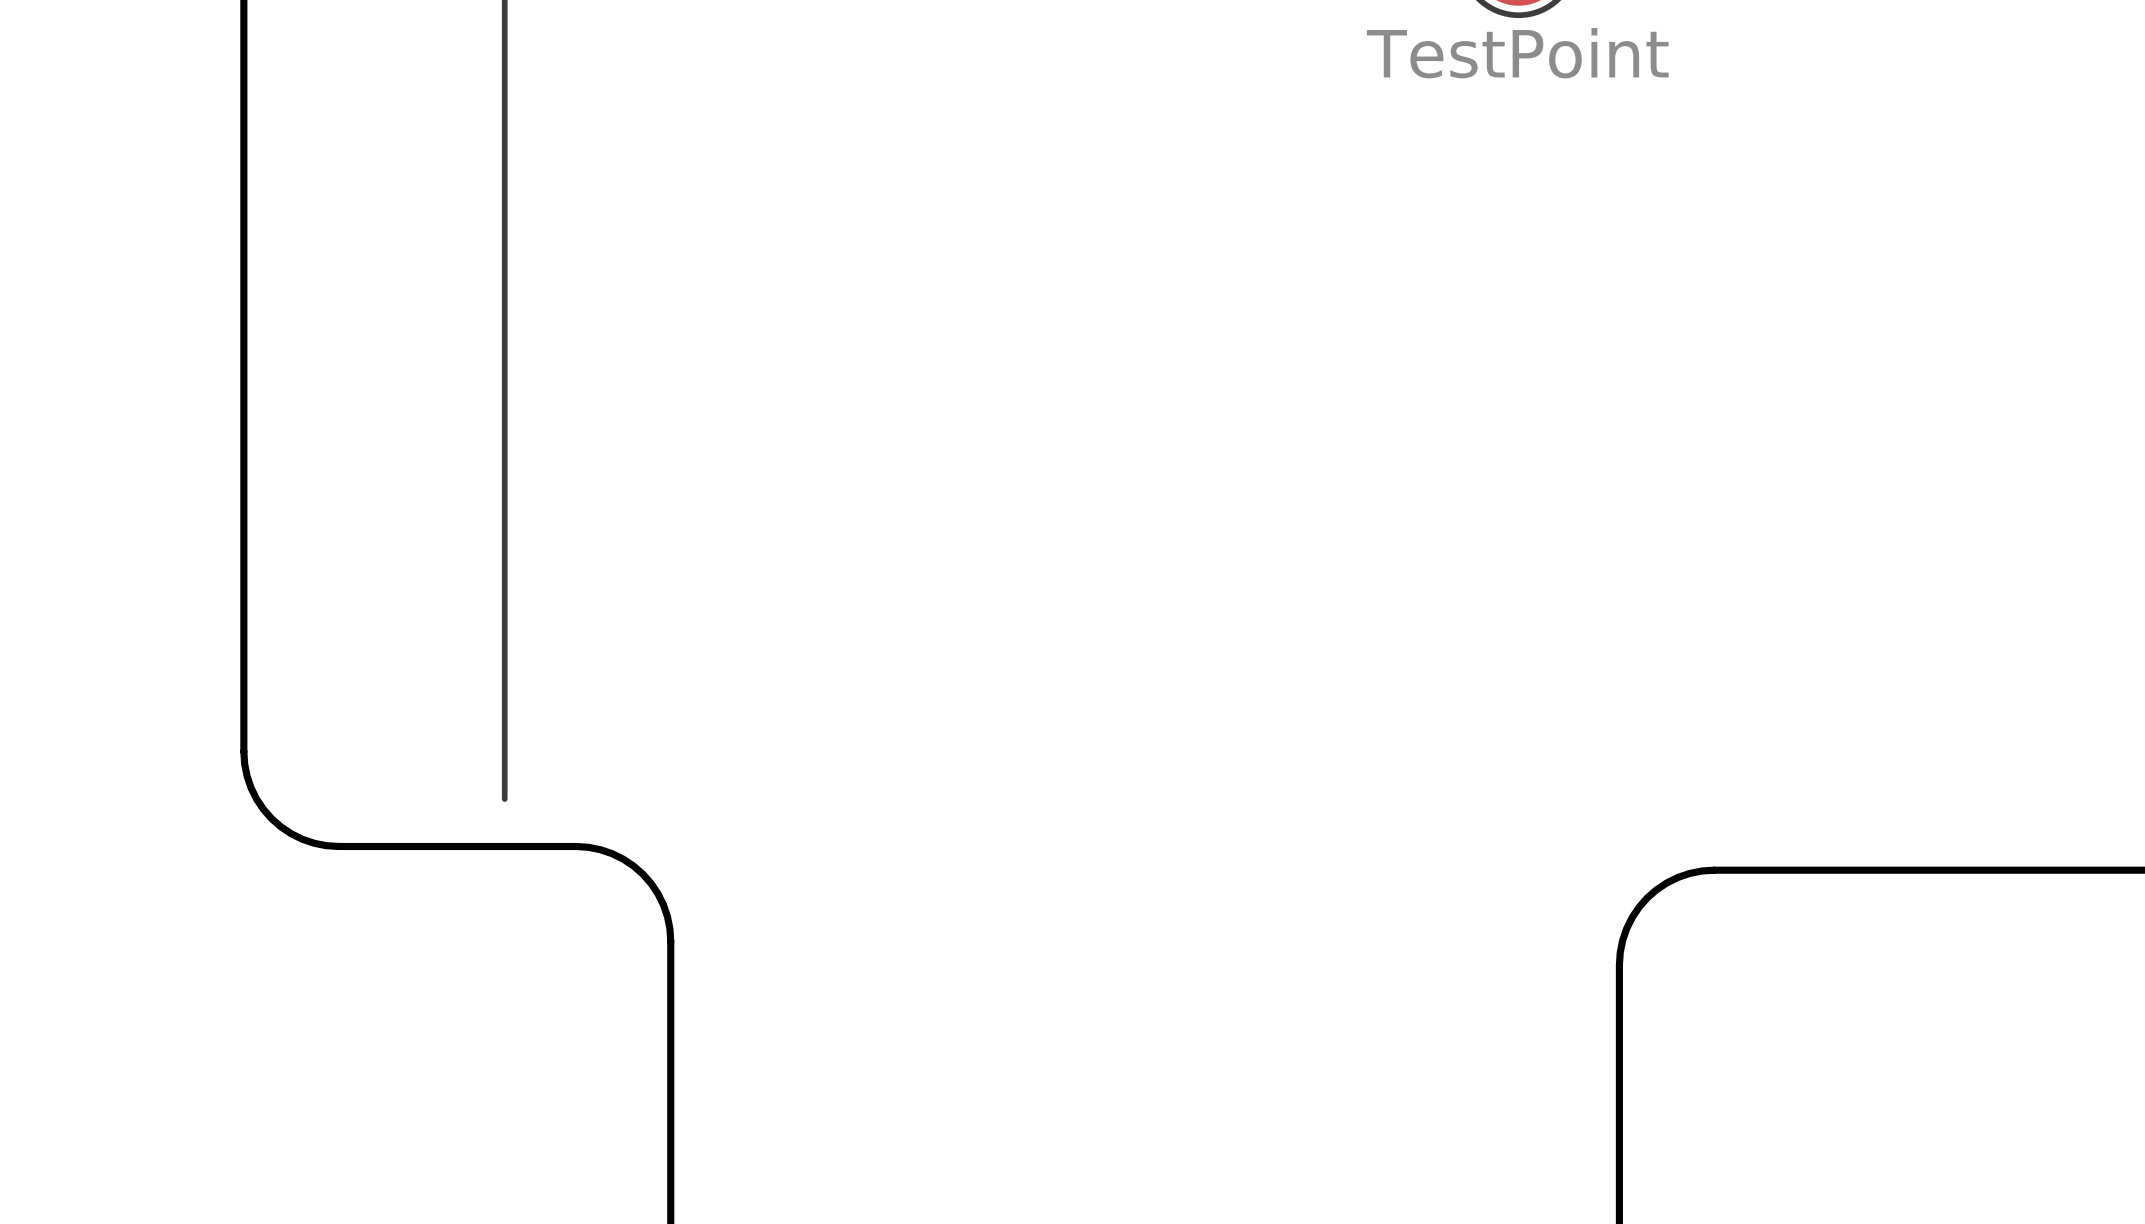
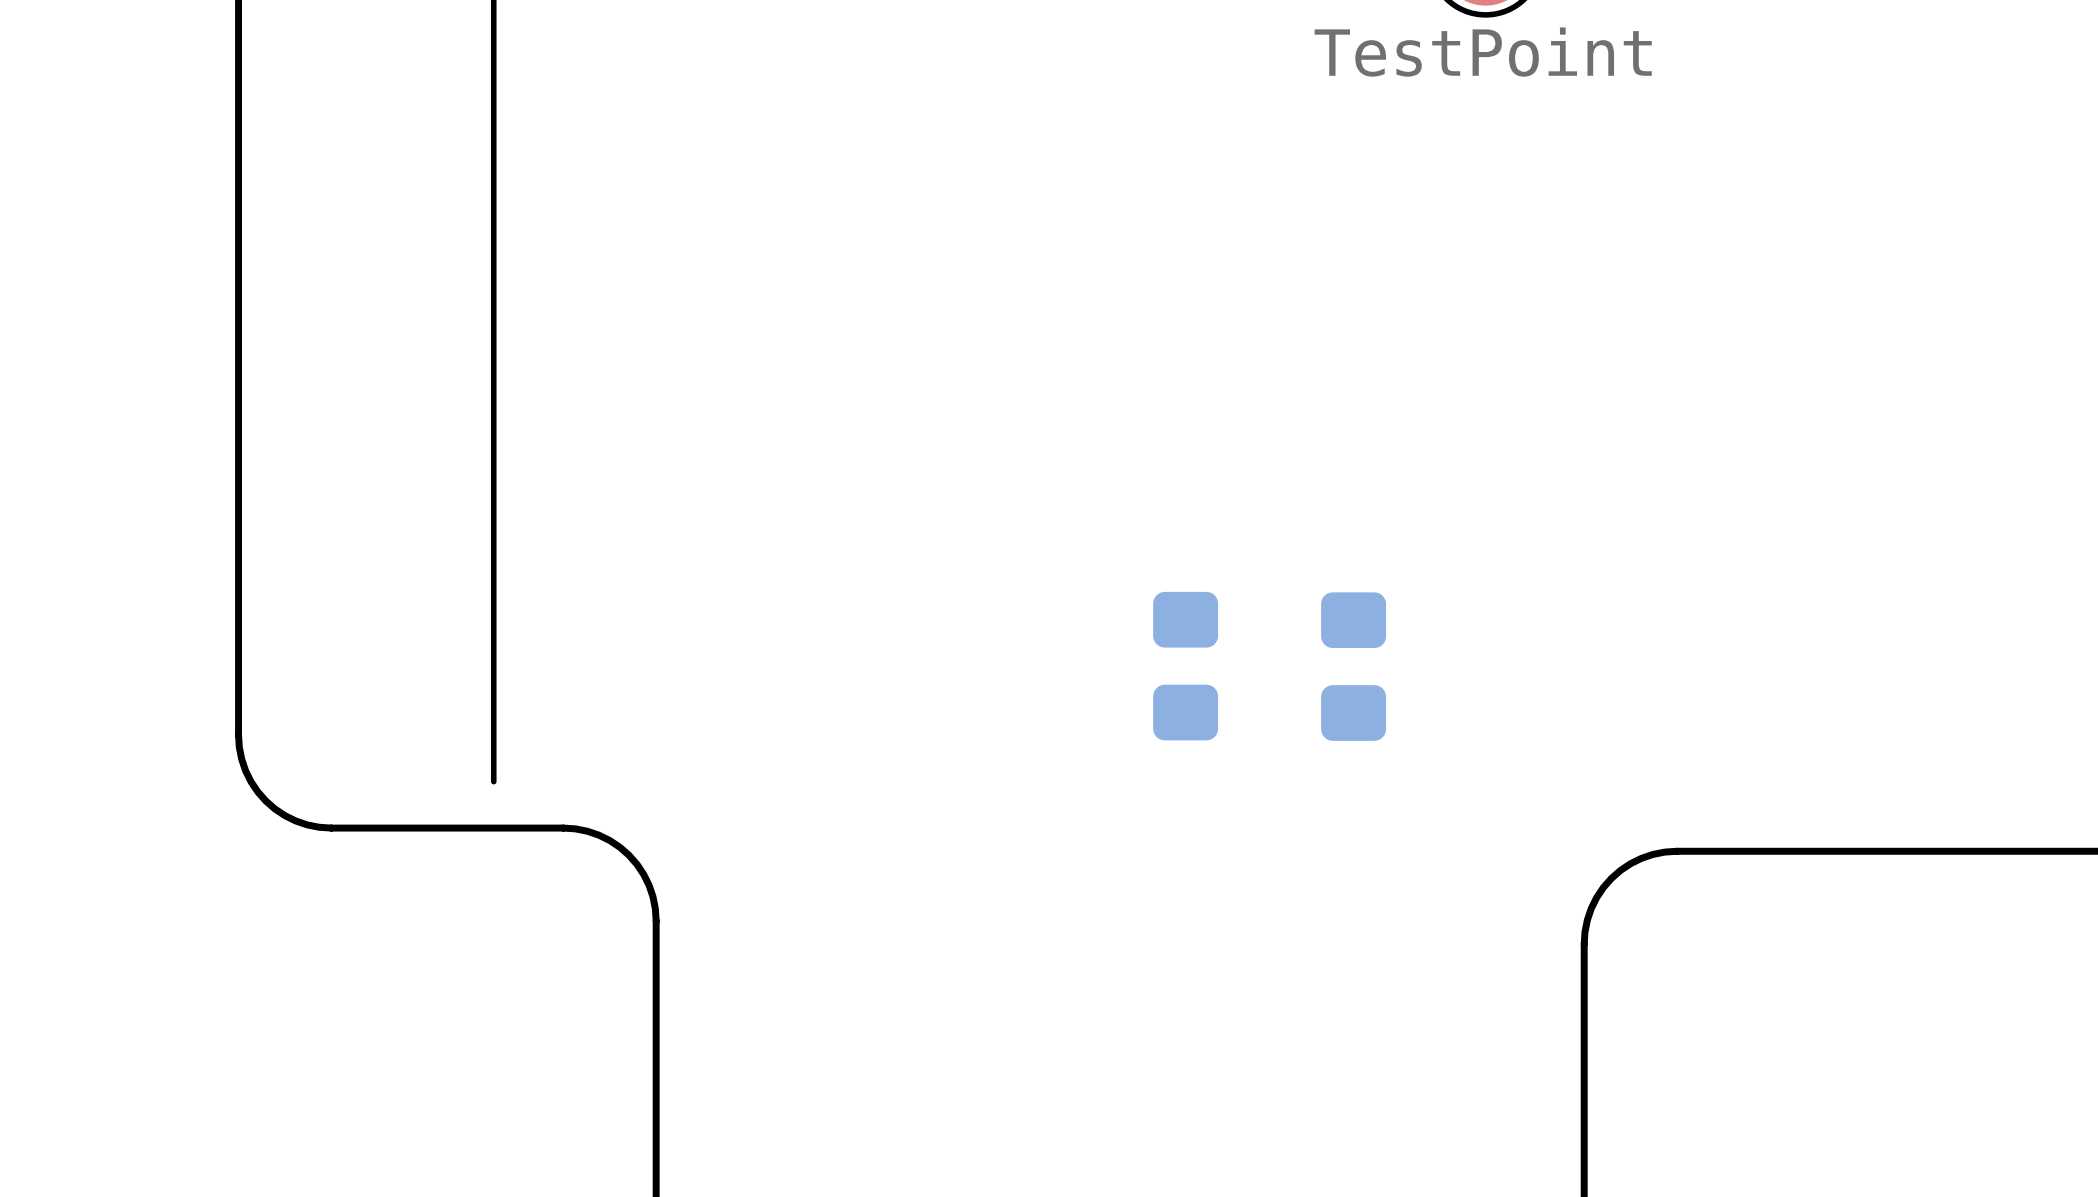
part: none -> (1185, 666)
part: none -> (1353, 666)

